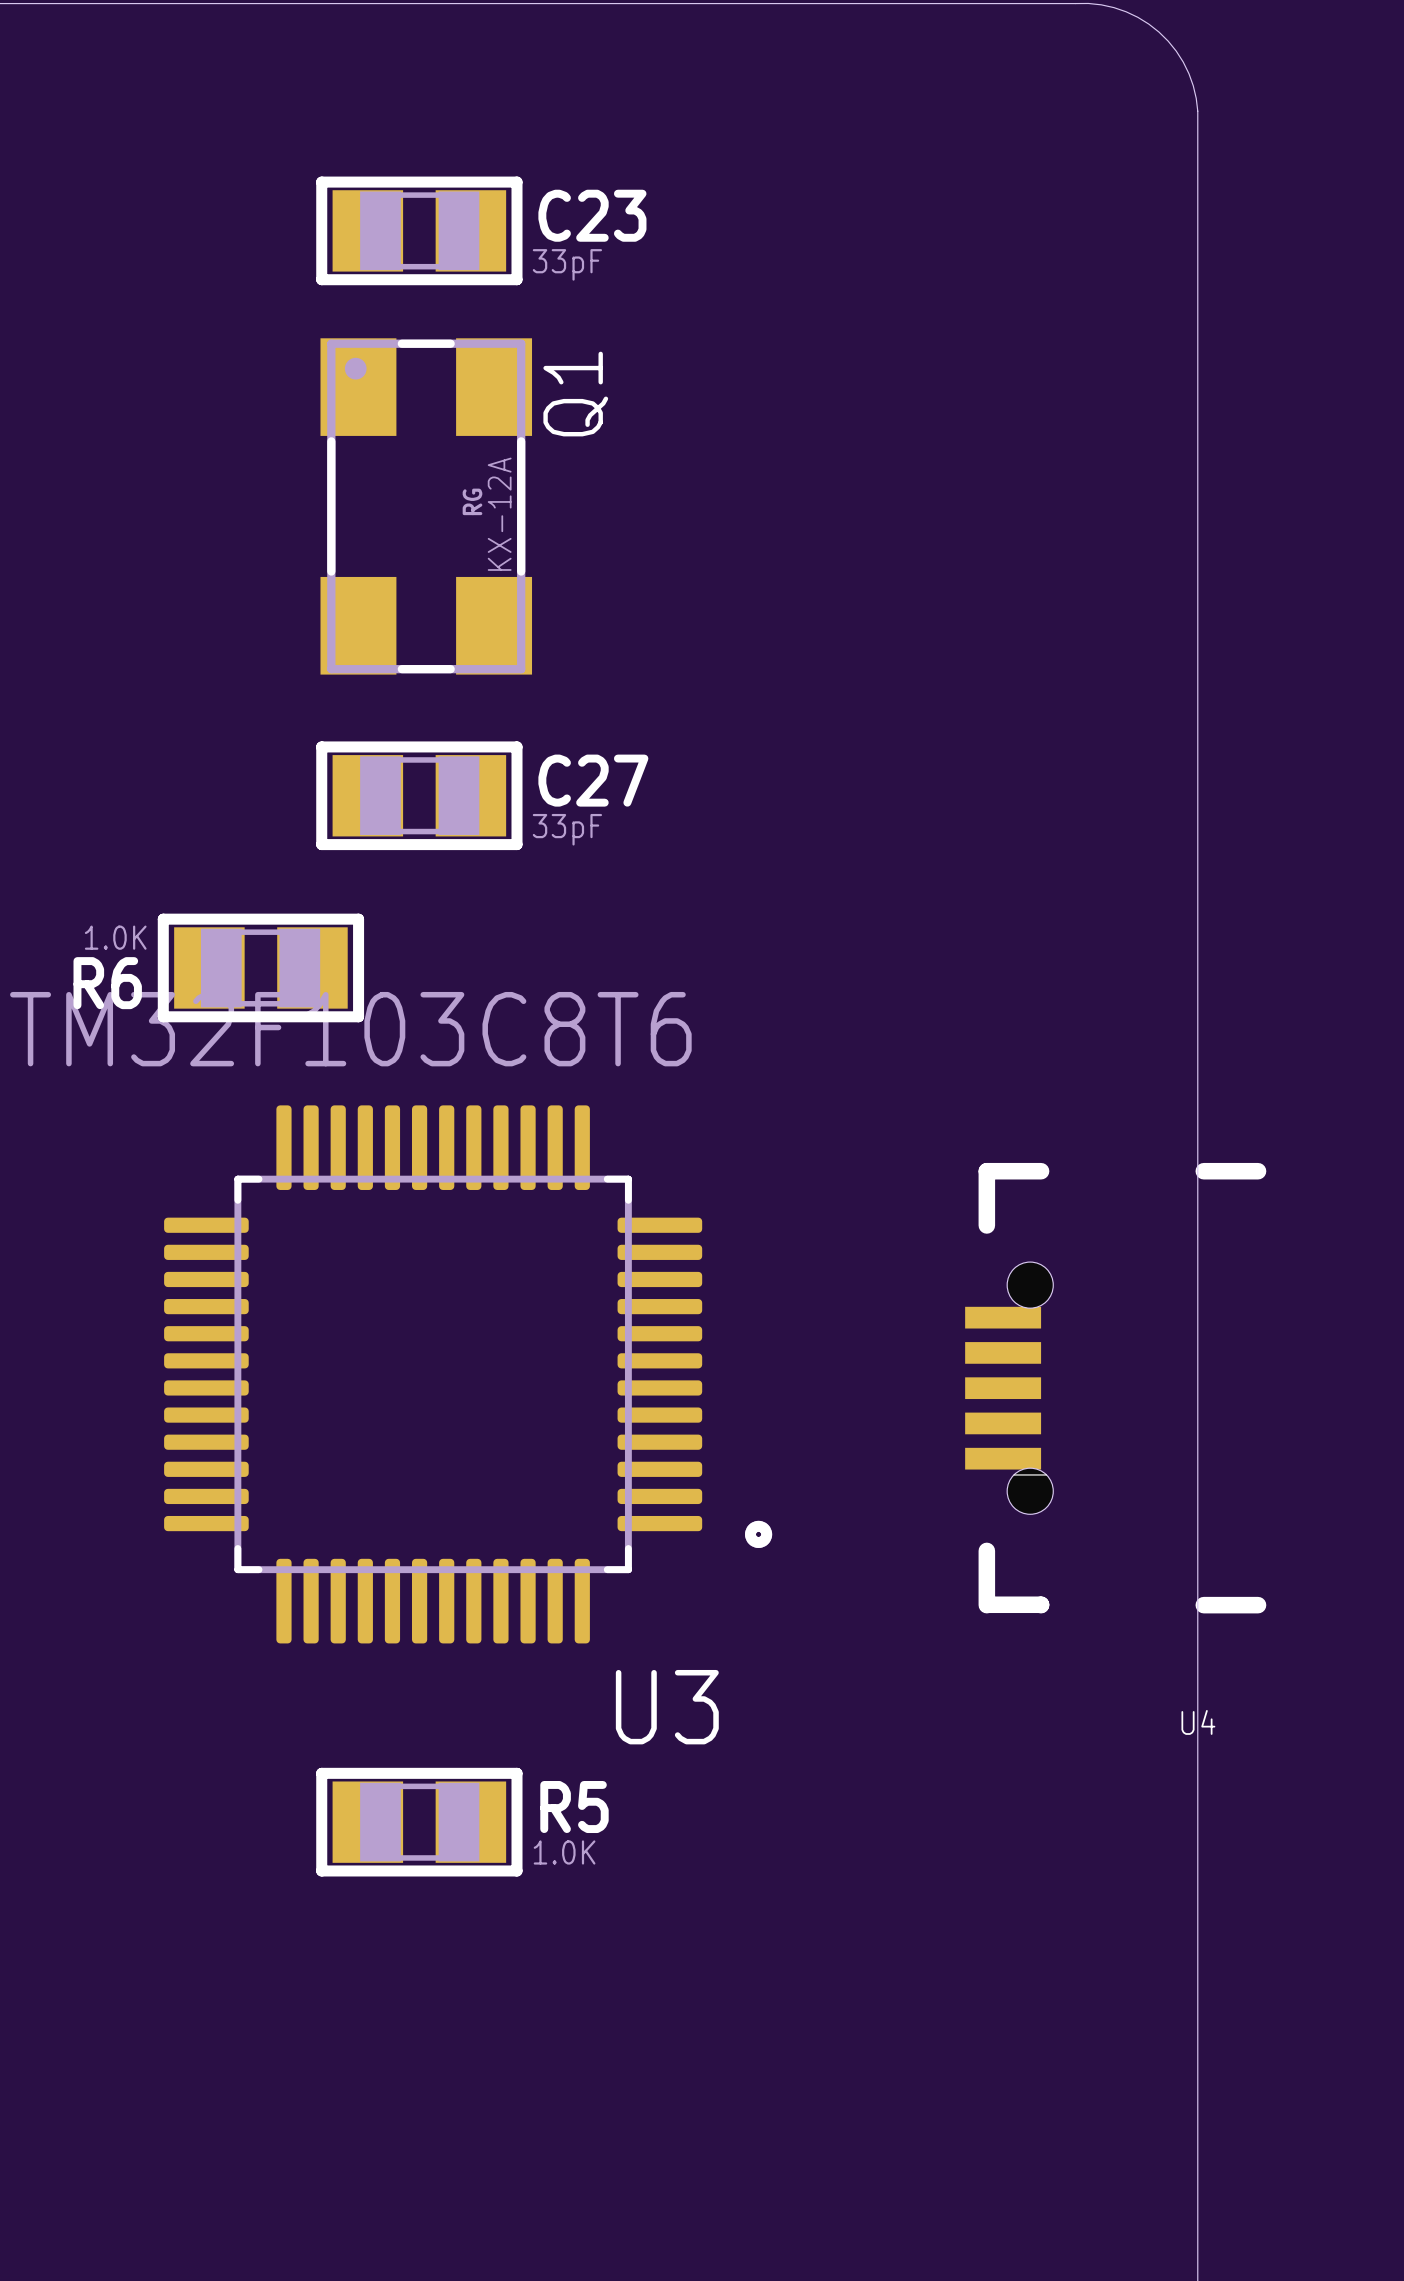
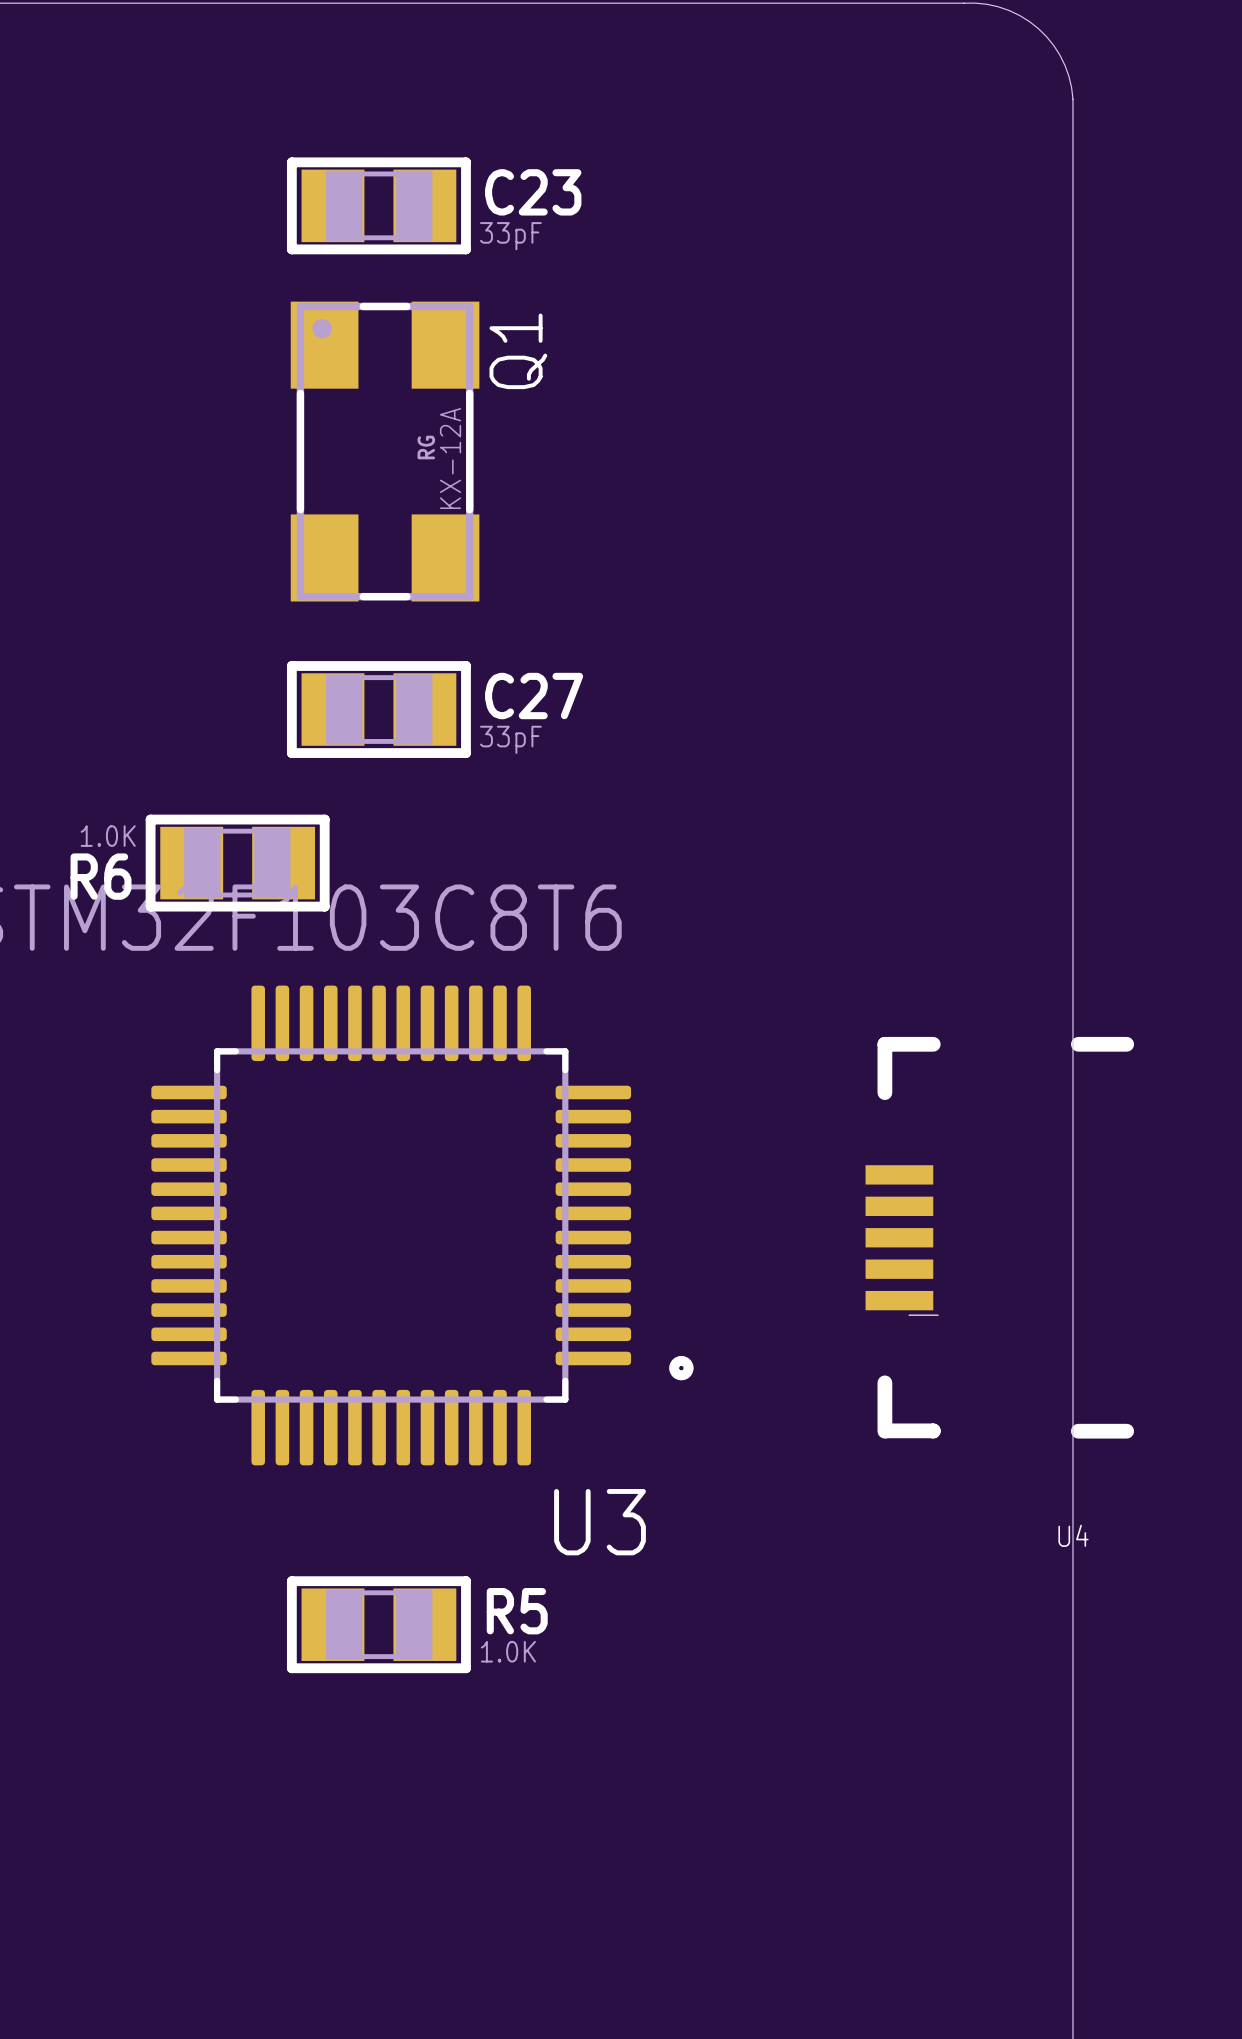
U4 footprint: [965, 1162, 1267, 1614] -> [865, 1036, 1135, 1439]

